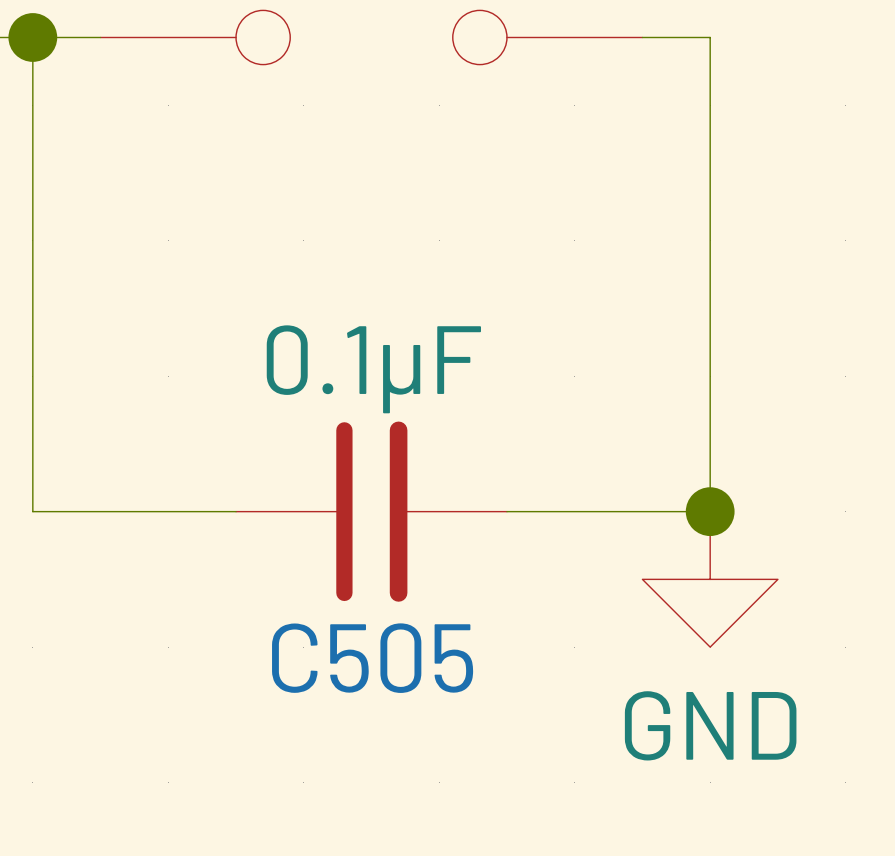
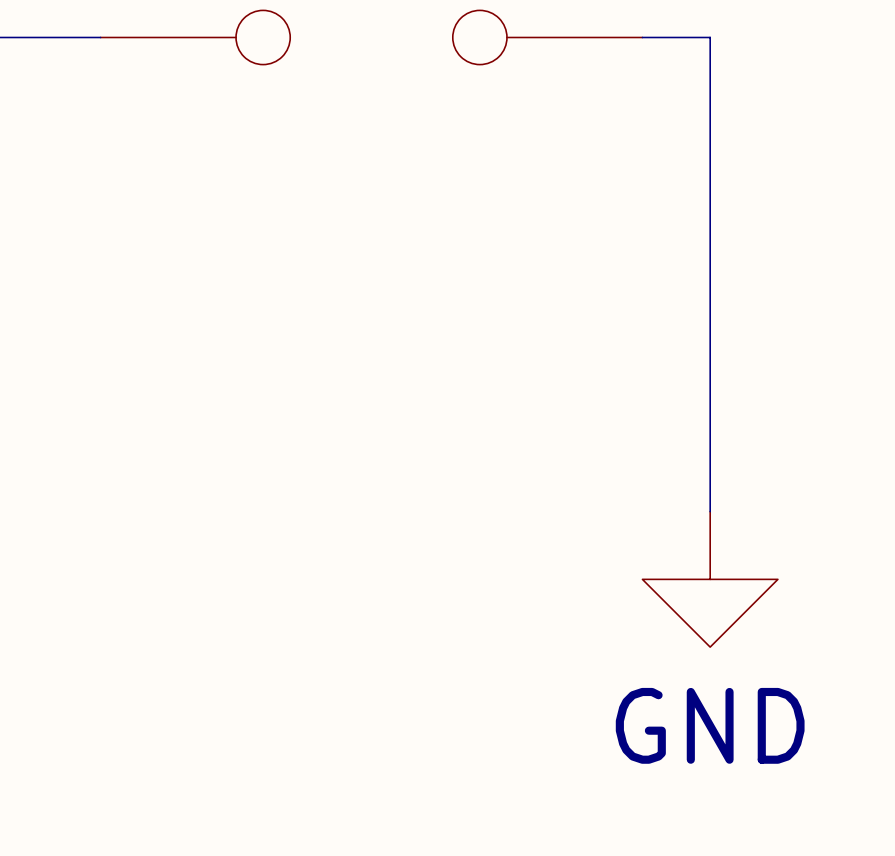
wire: (32, 37) (32, 511) (236, 511) -> none
junction: (32, 37) -> none
C505: 0.1µF (371, 511) -> none
wire: (506, 511) (710, 511) -> none
junction: (710, 511) -> none

